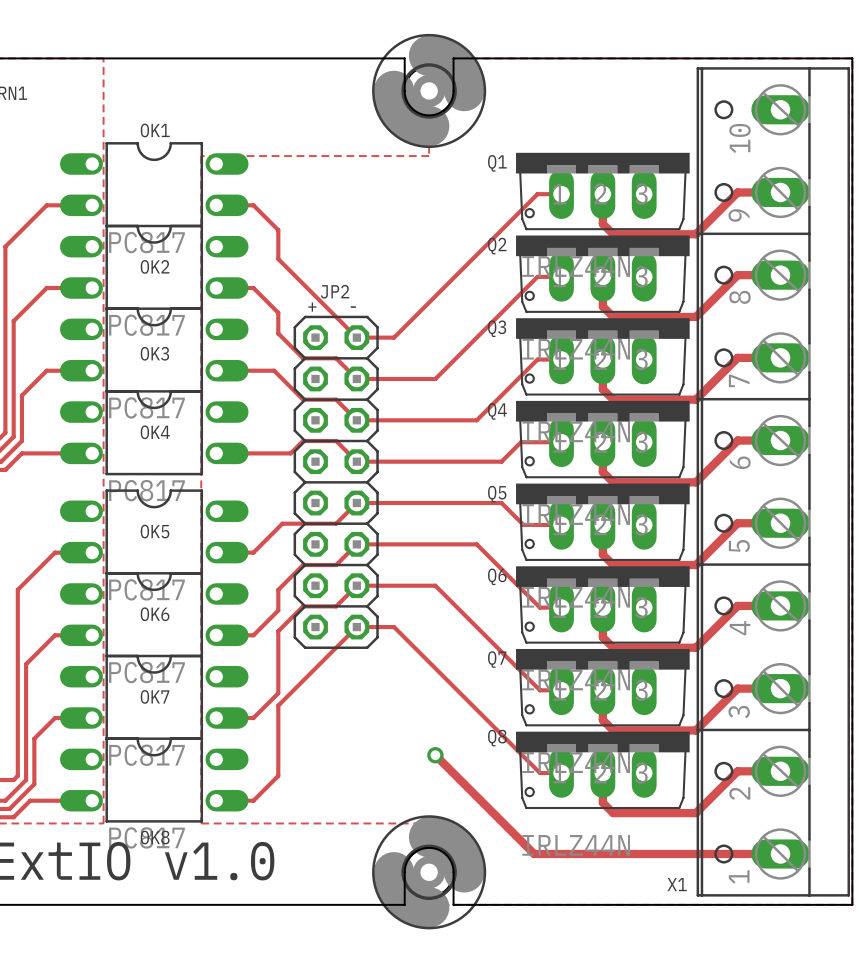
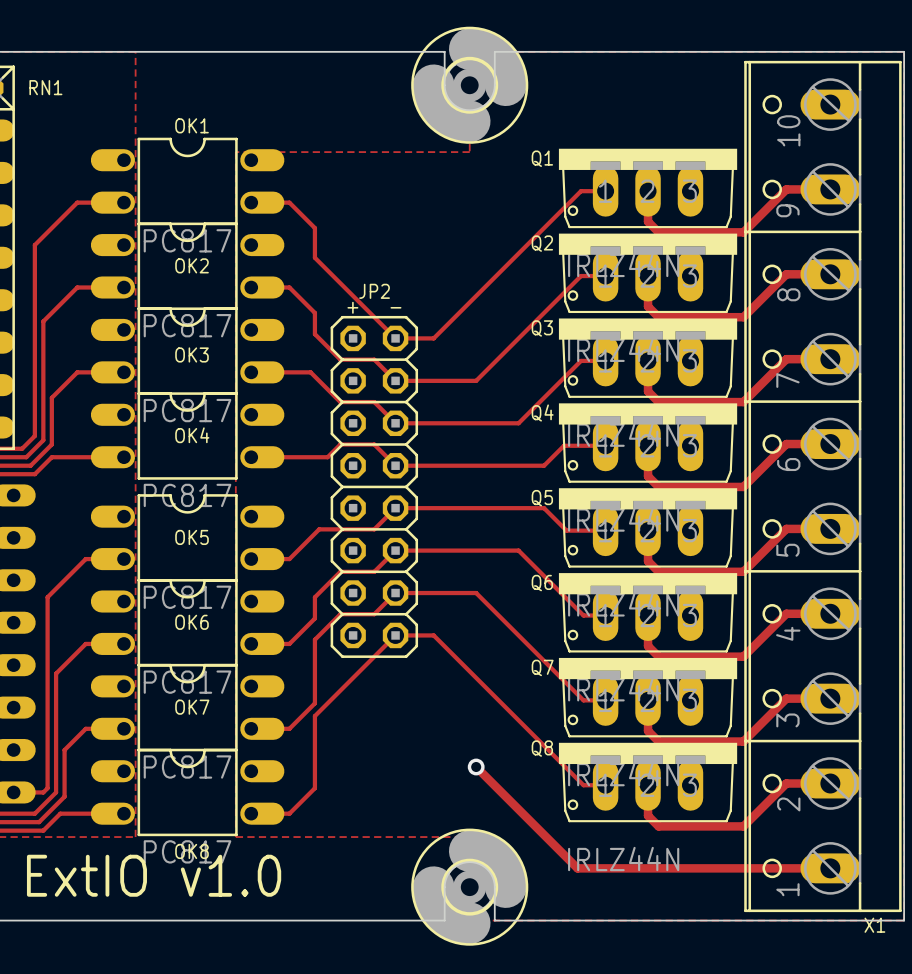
X1 name position: X1 (677, 884) -> X1 (874, 925)

